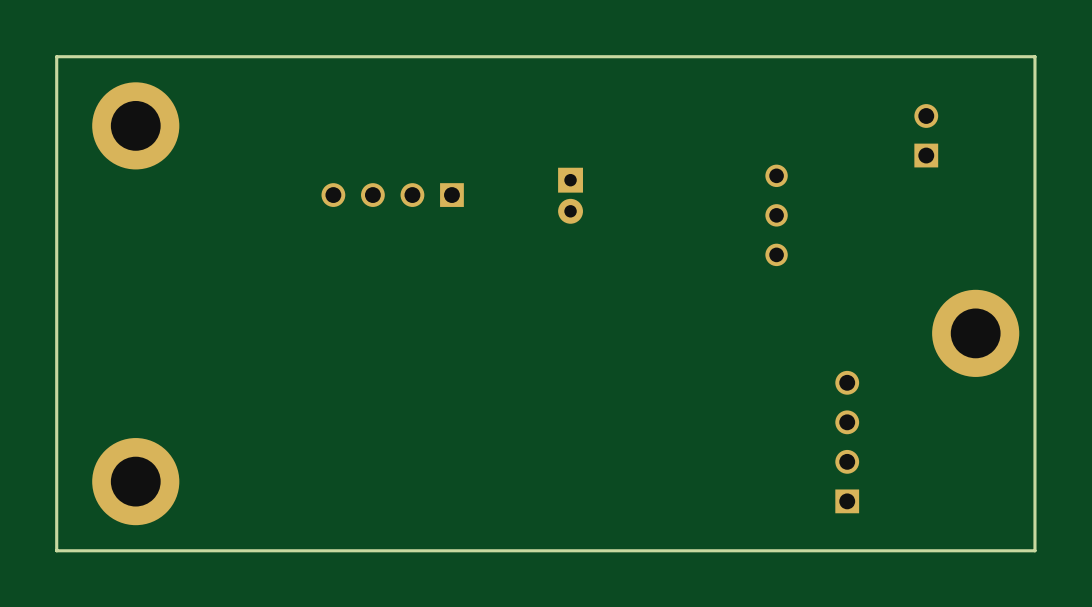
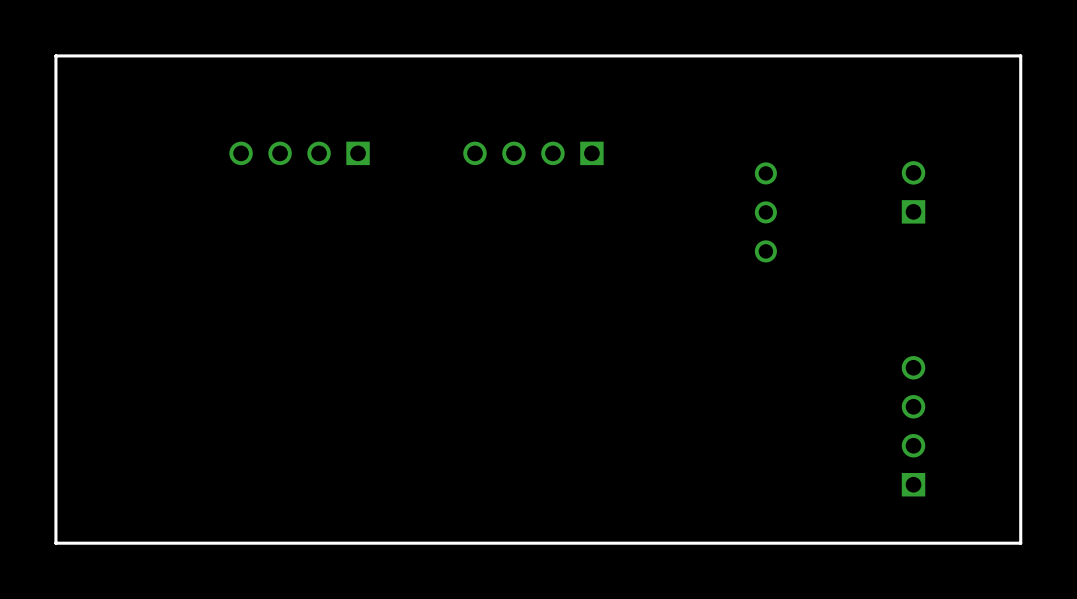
part: (135, 125) -> none
part position: (926, 135) -> (913, 192)
part: none -> (299, 153)
part: none -> (533, 153)
part: (392, 195) -> none
part: (570, 195) -> none
part: (975, 333) -> none
part position: (847, 442) -> (913, 426)
part: (135, 481) -> none

